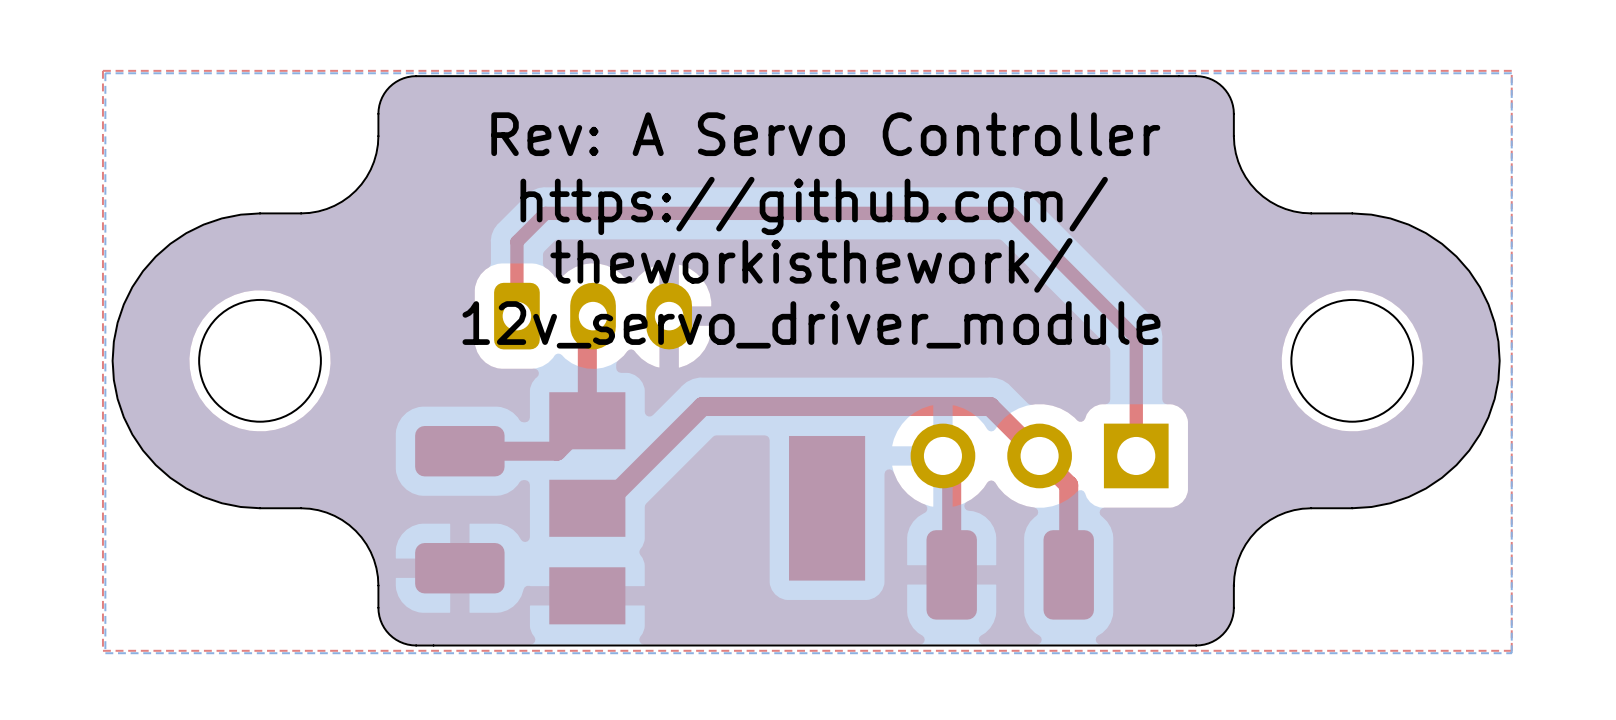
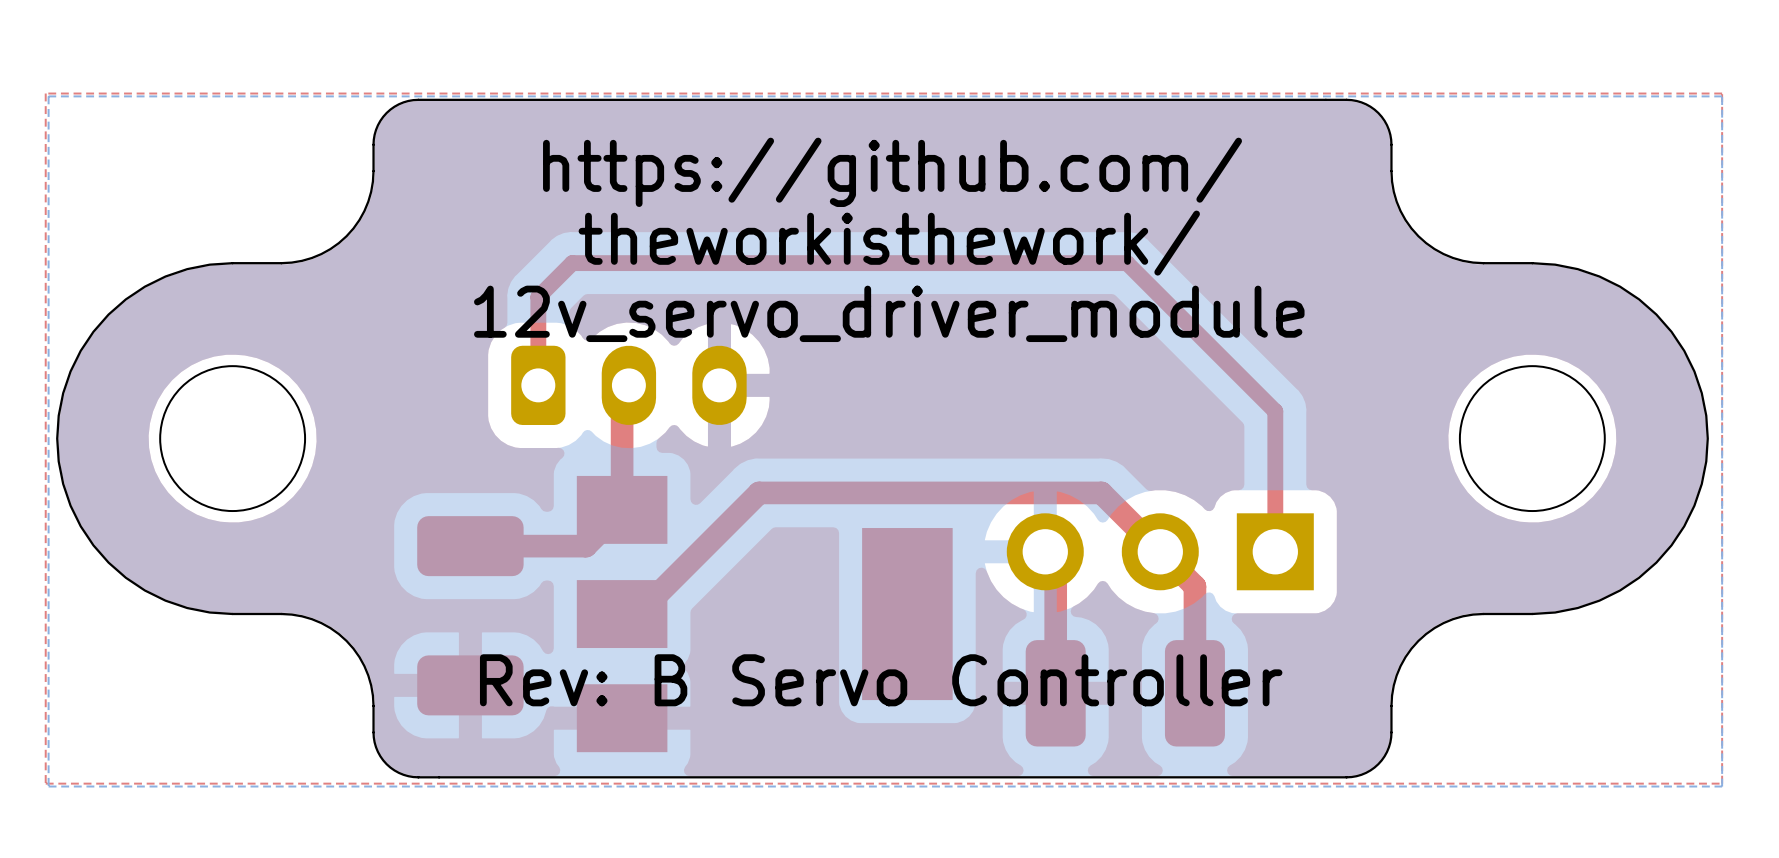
text: Rev: A Servo Controller (825, 134) -> none
text position: https://github.com/ (814, 205) -> https://github.com/ (892, 172)
text position: theworkisthework/ (811, 265) -> theworkisthework/ (889, 243)
text position: 12v_servo_driver_module (811, 324) -> 12v_servo_driver_module (889, 313)
text: none -> Rev: B Servo Controller (881, 680)

